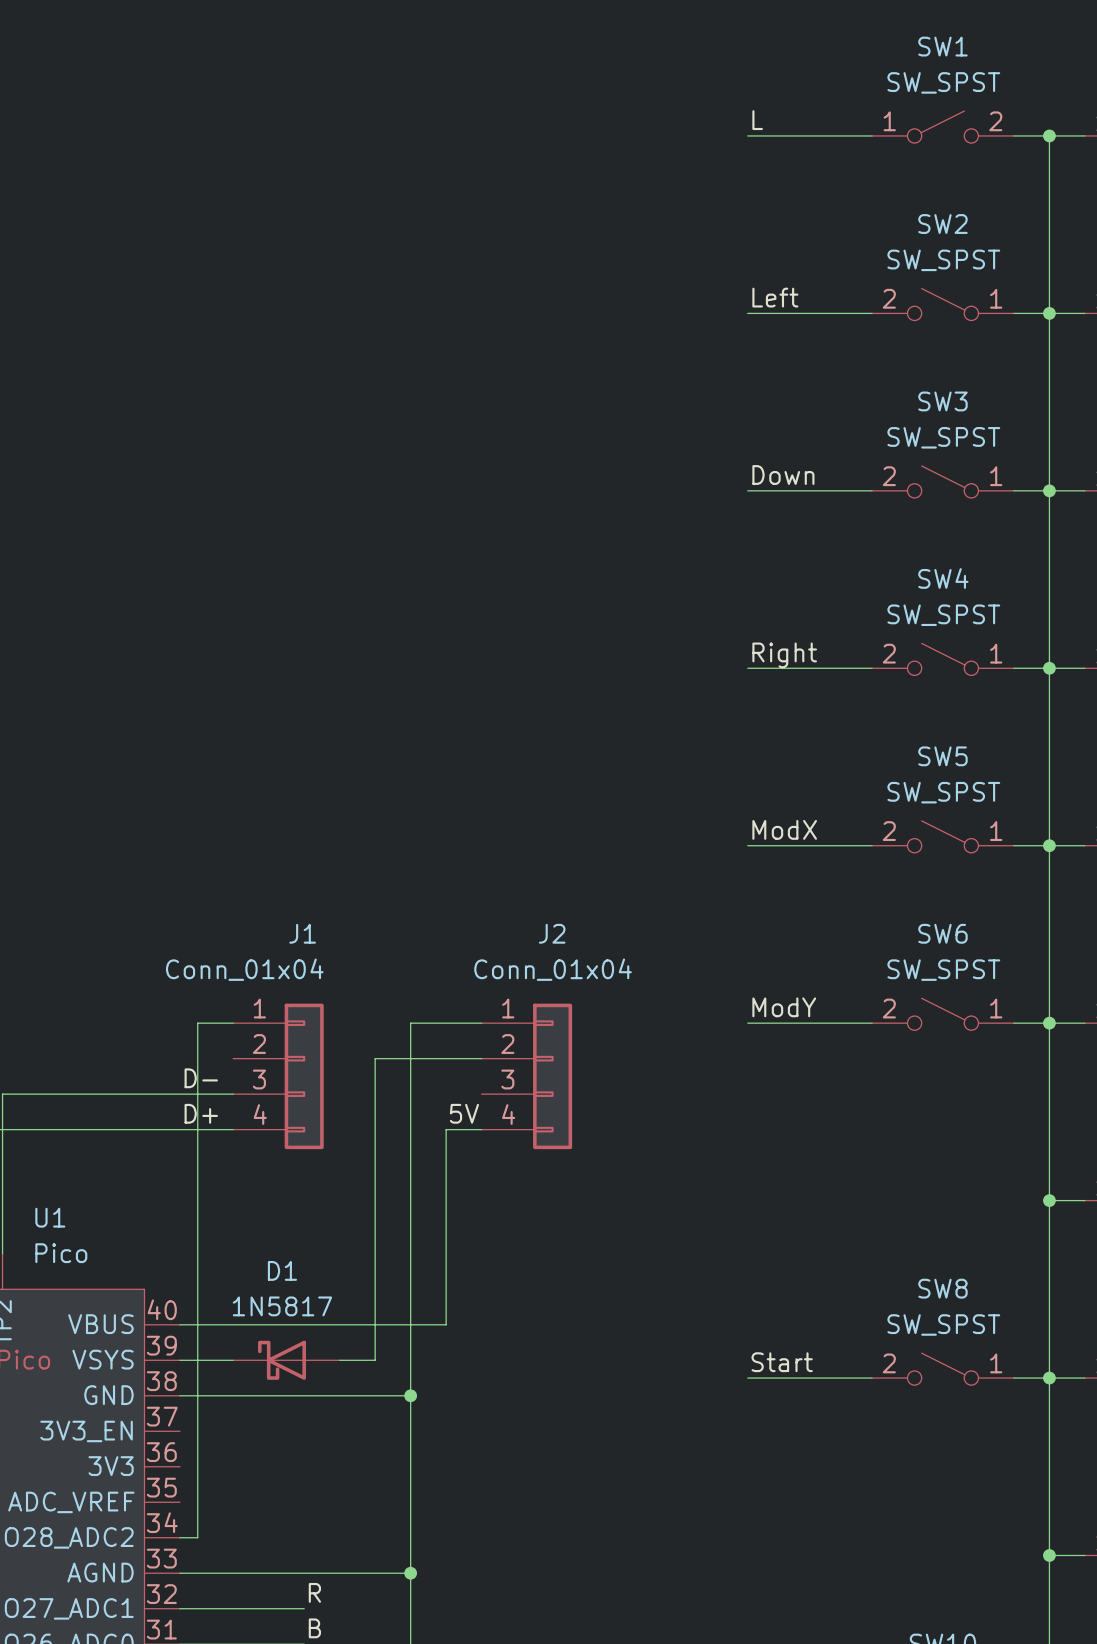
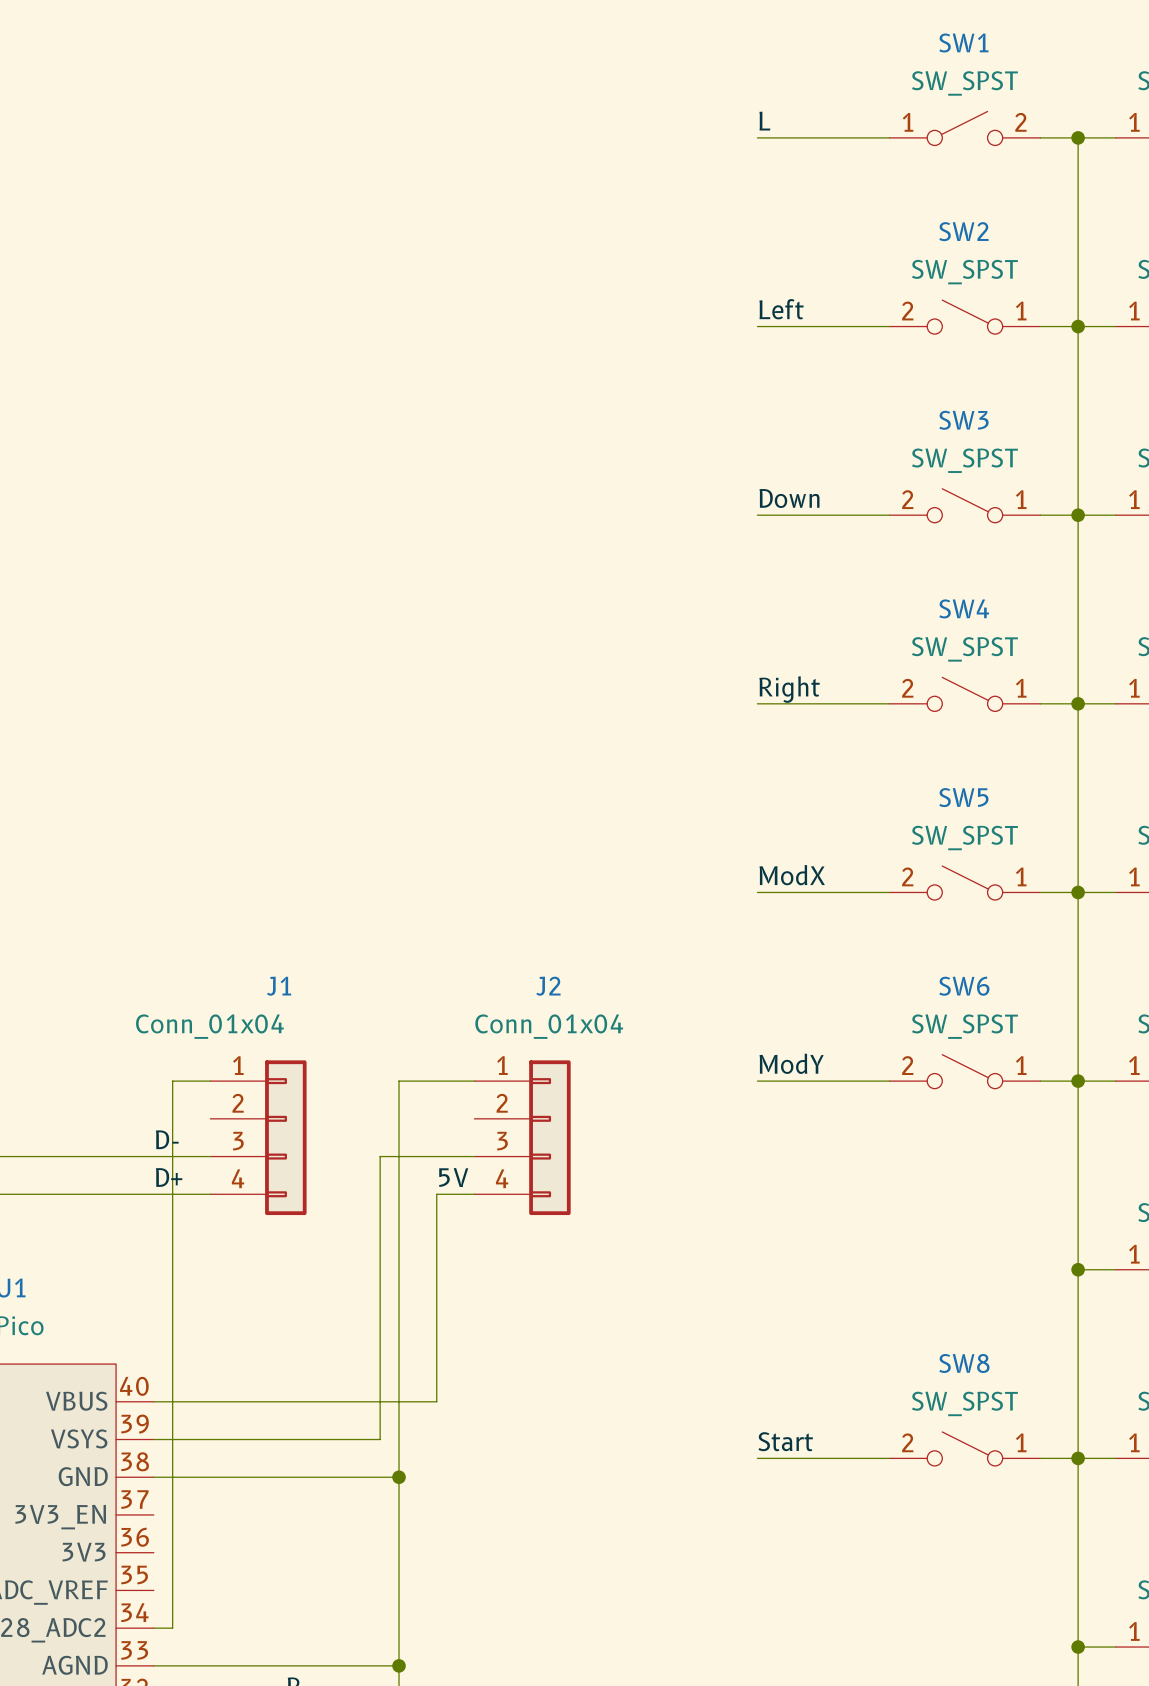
wire: (481, 1058) (375, 1058) (375, 1360) -> (474, 1156) (380, 1156) (380, 1439) (361, 1439)
D1: 1N5817 (286, 1360) -> none

